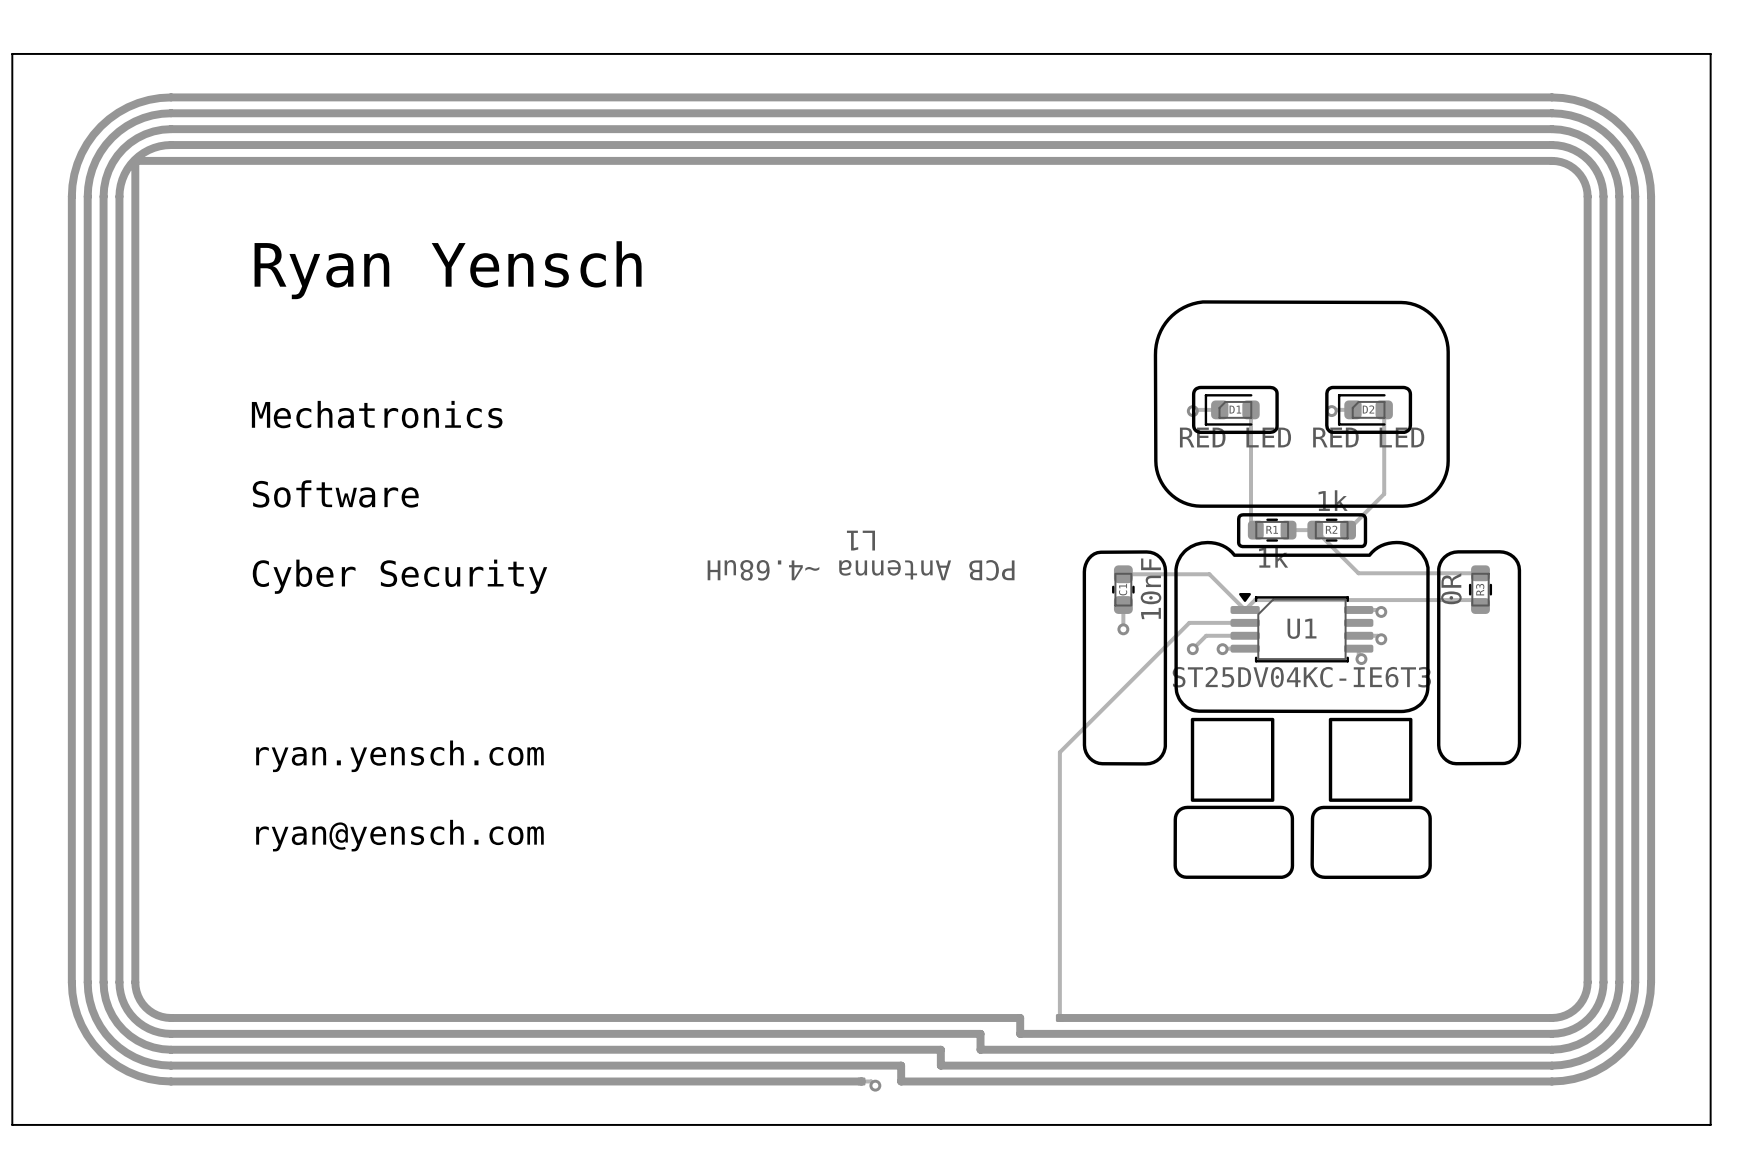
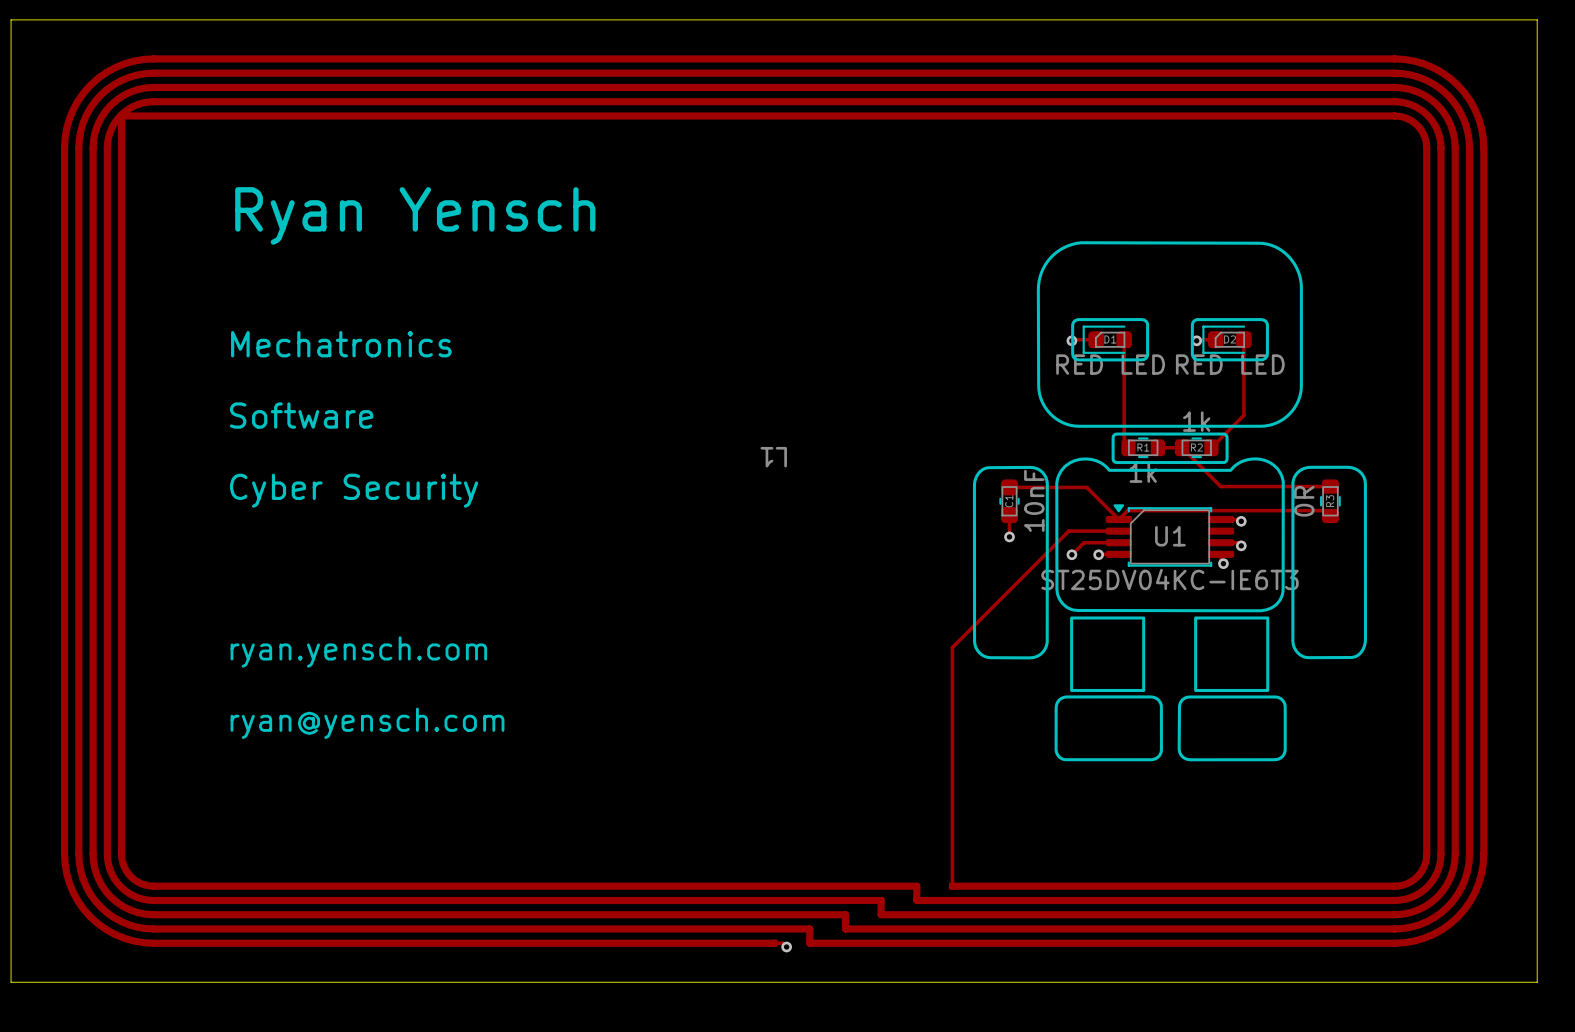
L1 value: PCB Antenna ~4.68uH (861, 570) -> none

